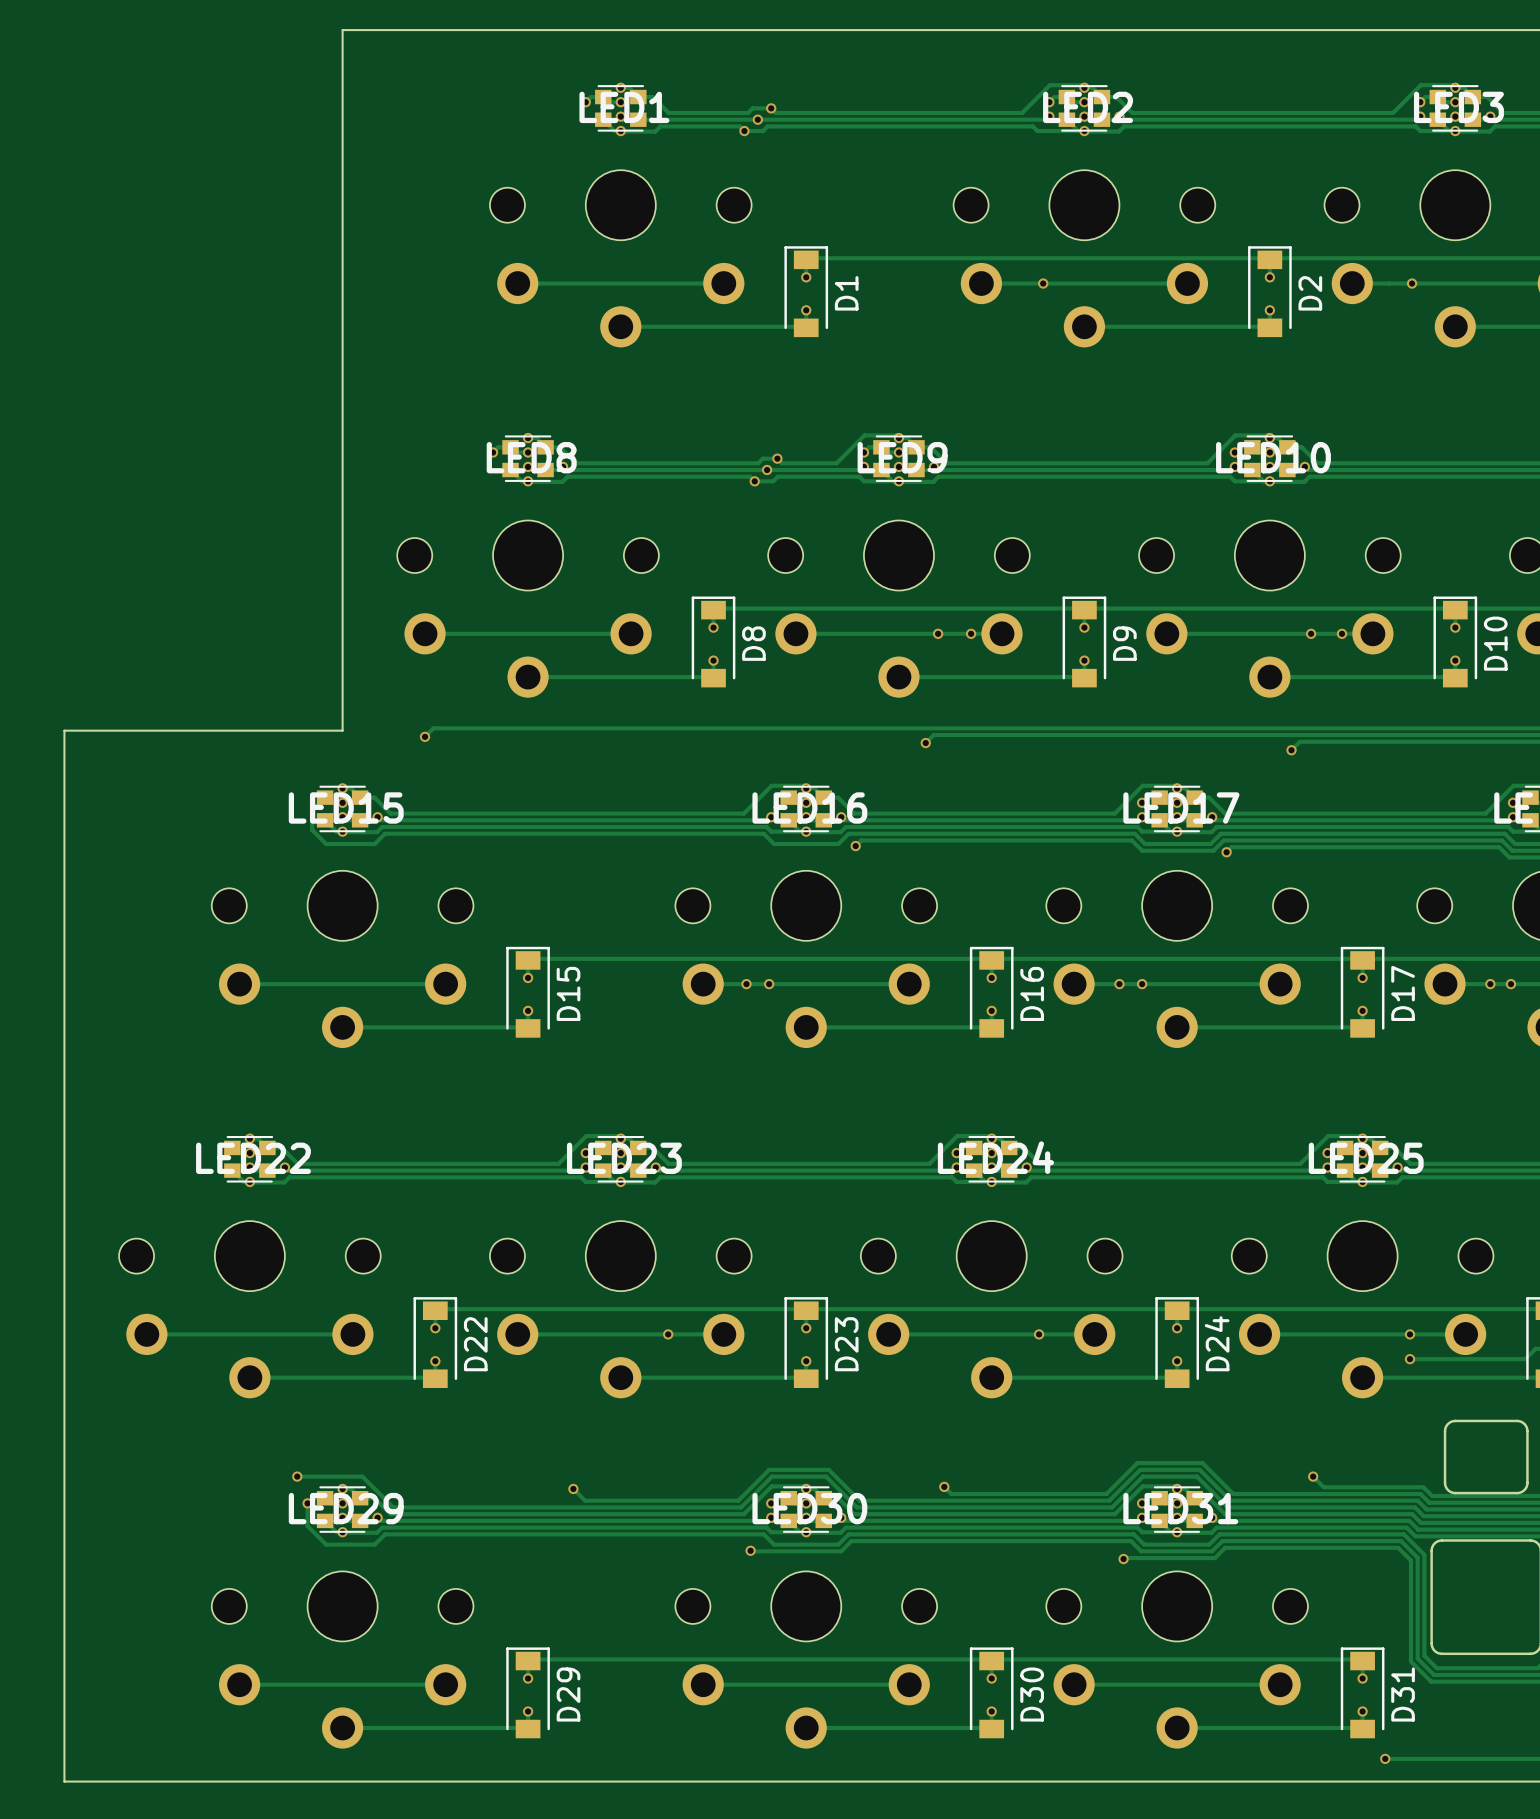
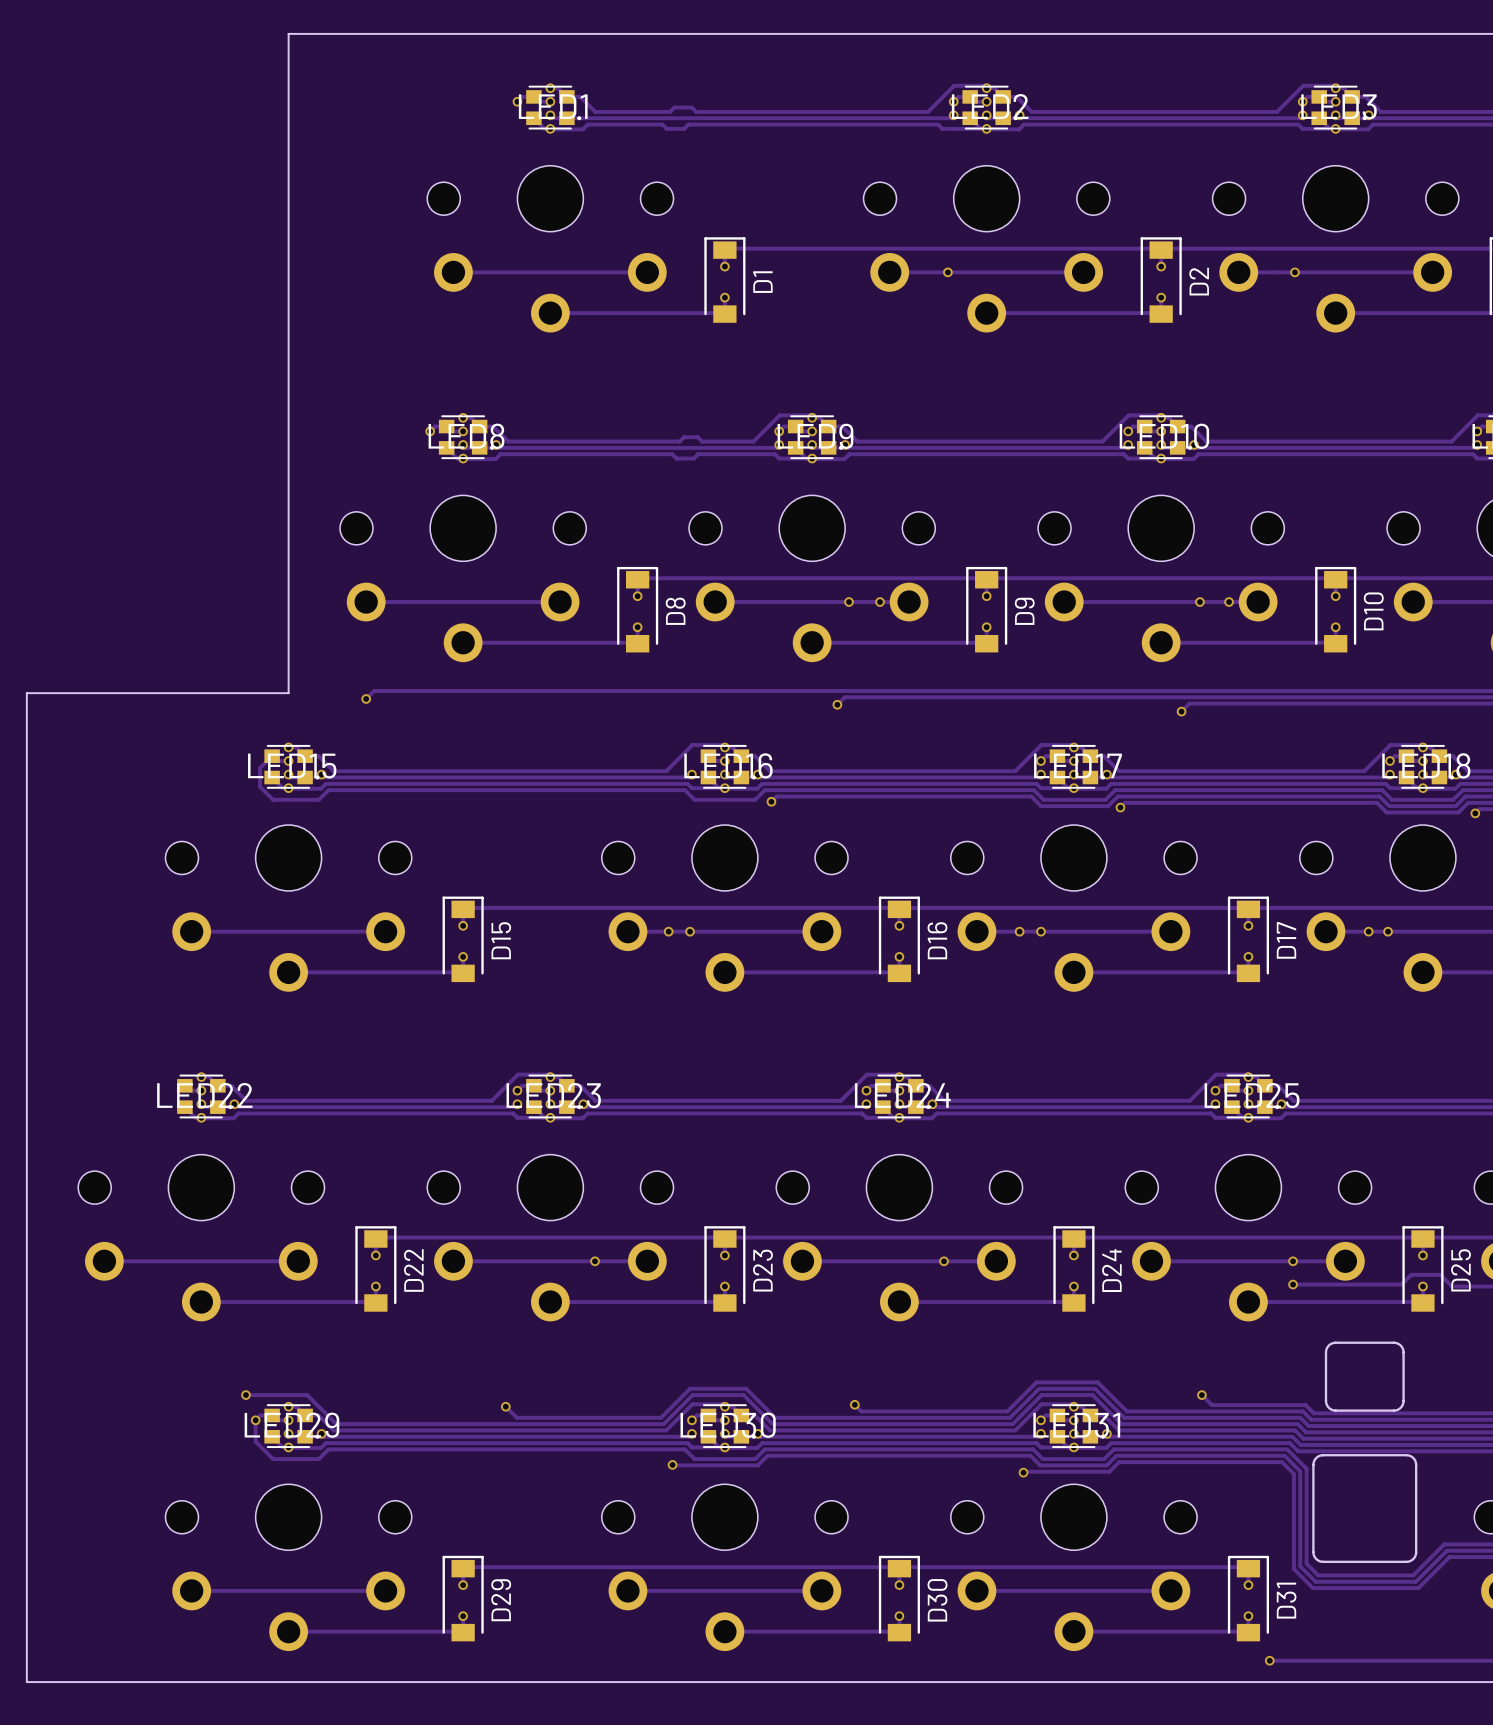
via: (771, 108) -> none
via: (757, 119) -> none
via: (744, 131) -> none
via: (777, 458) -> none
via: (767, 470) -> none
via: (754, 481) -> none

